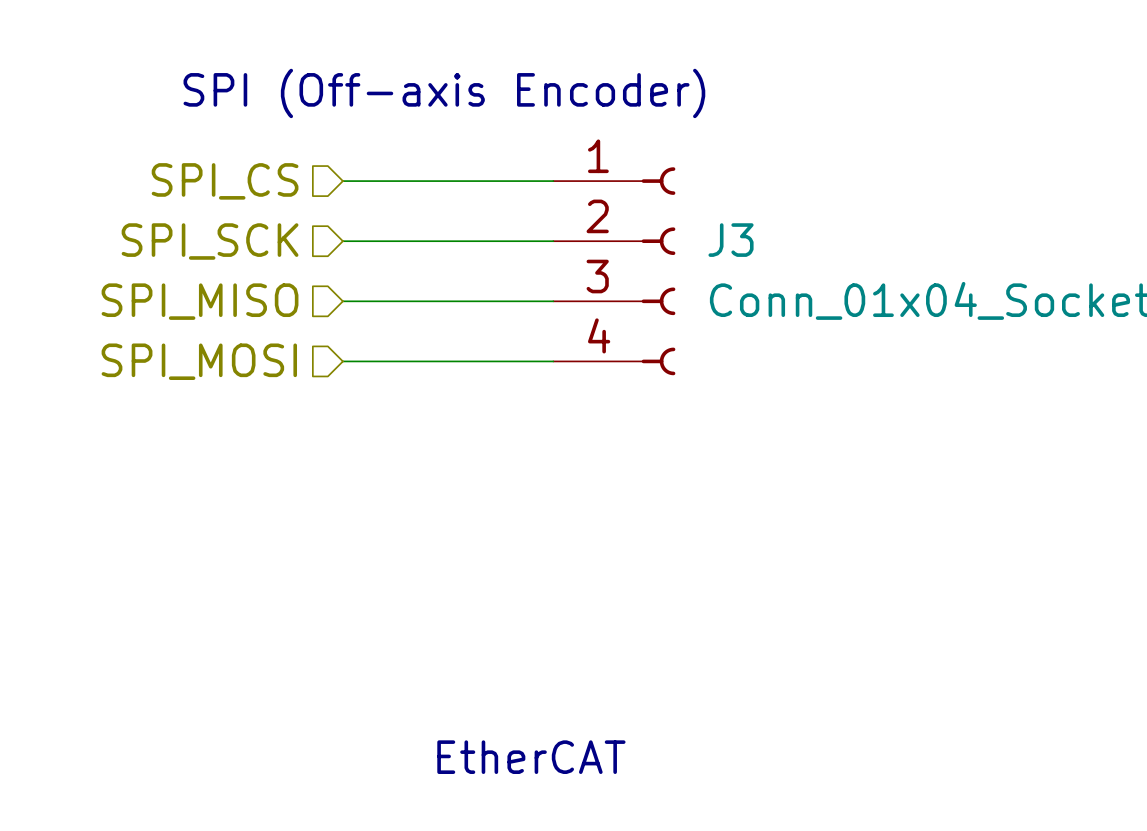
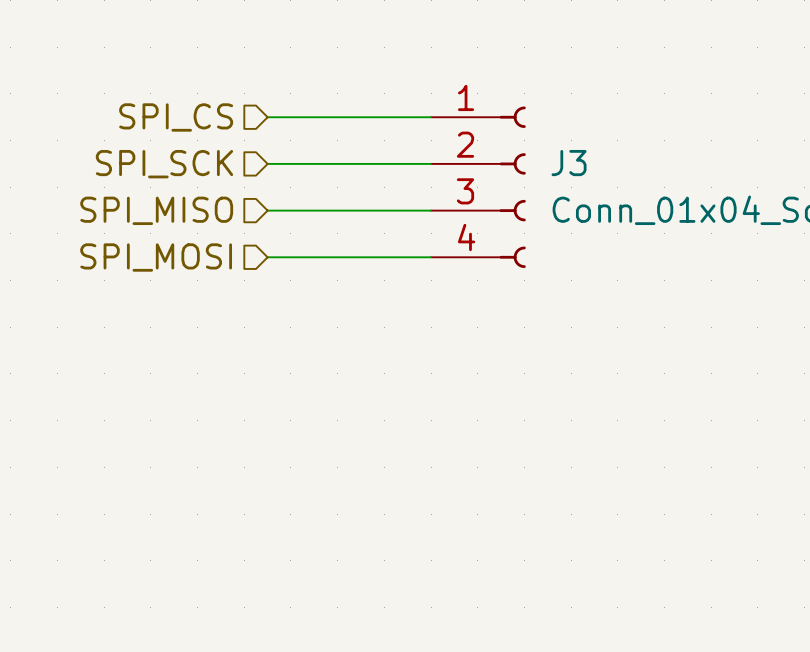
text: SPI (Off-axis Encoder) (444, 93) -> none
text: EtherCAT (531, 757) -> none

